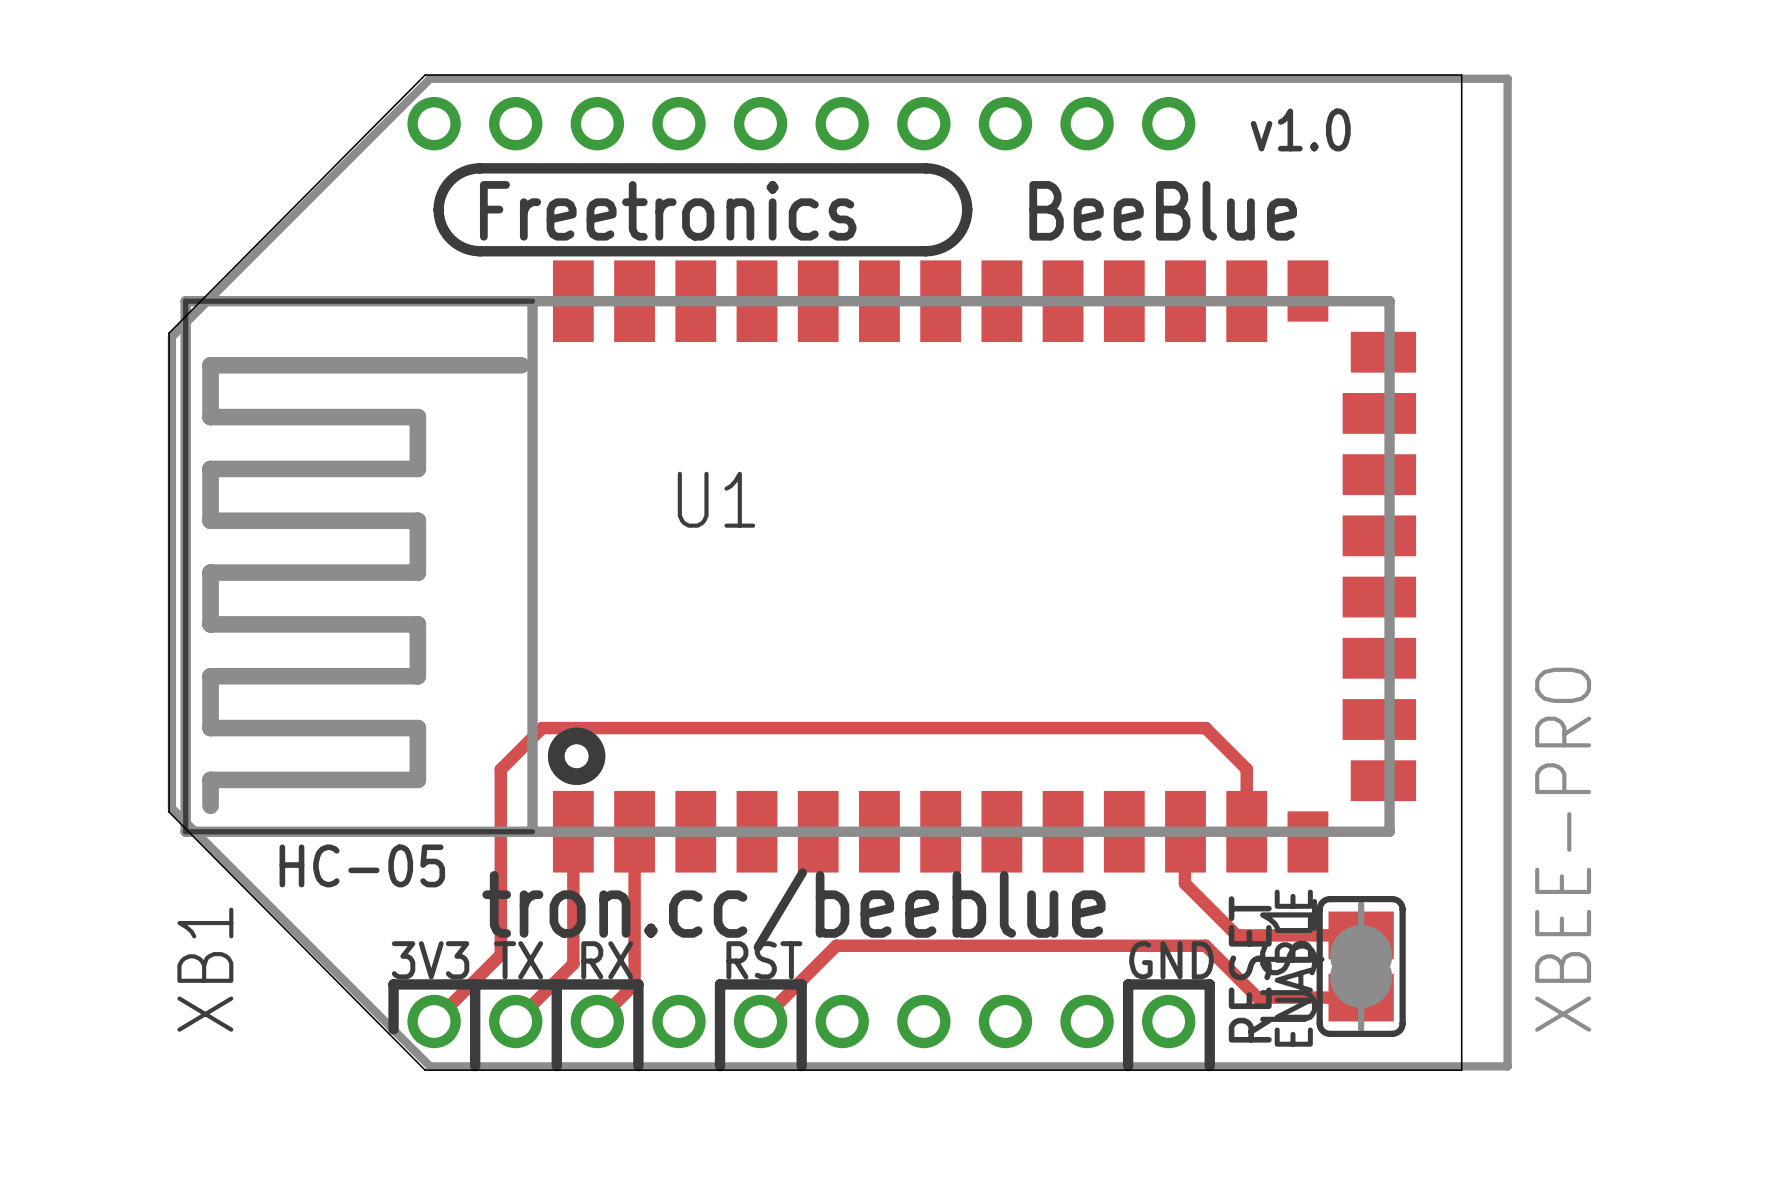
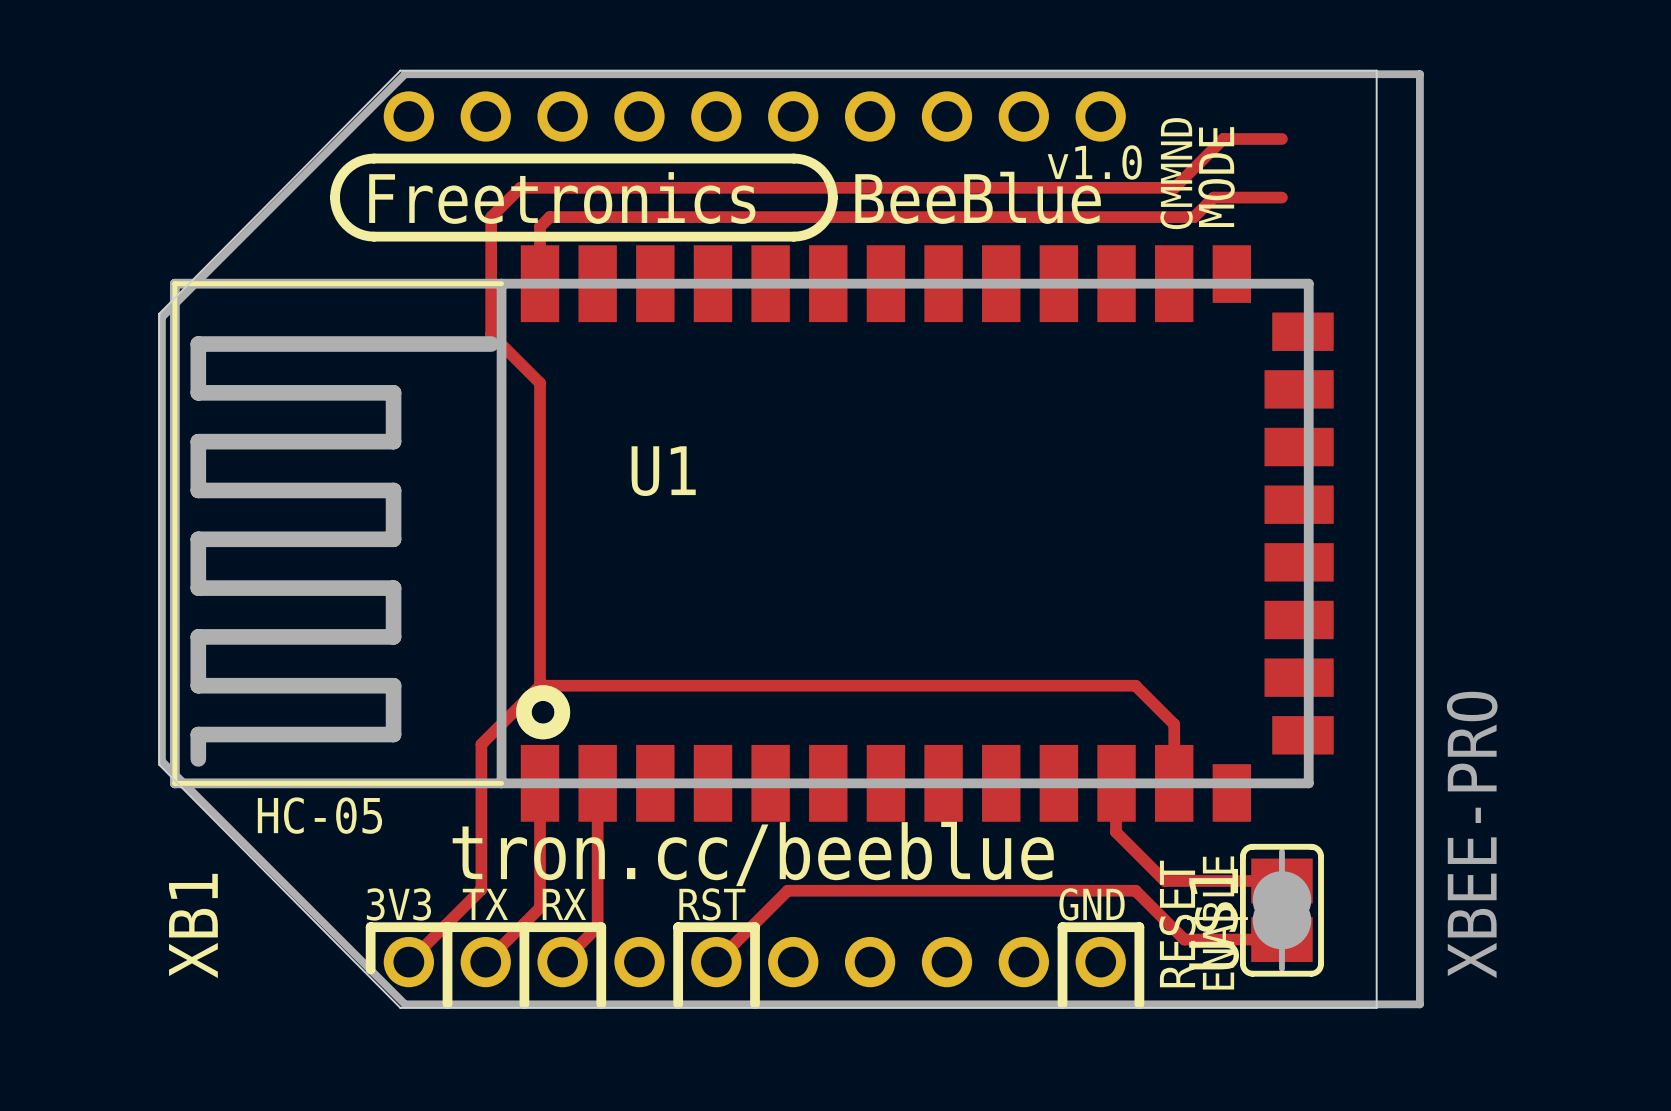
text position: v1.0 (1300, 129) -> v1.0 (1094, 162)
text: none -> CMMND (1176, 173)
line: (480, 168) (464, 171) (450, 180) (441, 193) (438, 209) (441, 225) (450, 239) (464, 248) (480, 251) -> (452, 158) (363, 159) (354, 163) (343, 173) (337, 182) (334, 197) (337, 212) (343, 221) (354, 231) (363, 235) (452, 236)
line: (842, 168) (936, 169) (946, 173) (958, 184) (964, 193) (967, 209) (964, 225) (958, 235) (946, 245) (936, 249) (842, 251) -> (793, 158) (808, 161) (821, 169) (829, 182) (832, 197) (829, 212) (821, 225) (808, 233) (793, 236)
text: none -> MODE (1216, 177)
top track: none -> (1281, 197) (1213, 197) (1194, 217) (549, 217) (540, 226) (540, 283)
text position: Freetronics (668, 210) -> Freetronics (562, 198)
text position: BeeBlue (1163, 210) -> BeeBlue (978, 197)
top track: (573, 728) (542, 728) (500, 769) (500, 954) -> (1281, 139) (1223, 139) (1174, 187) (520, 187) (491, 217) (491, 334) (540, 383) (540, 685) (481, 744) (481, 889) (471, 899)

